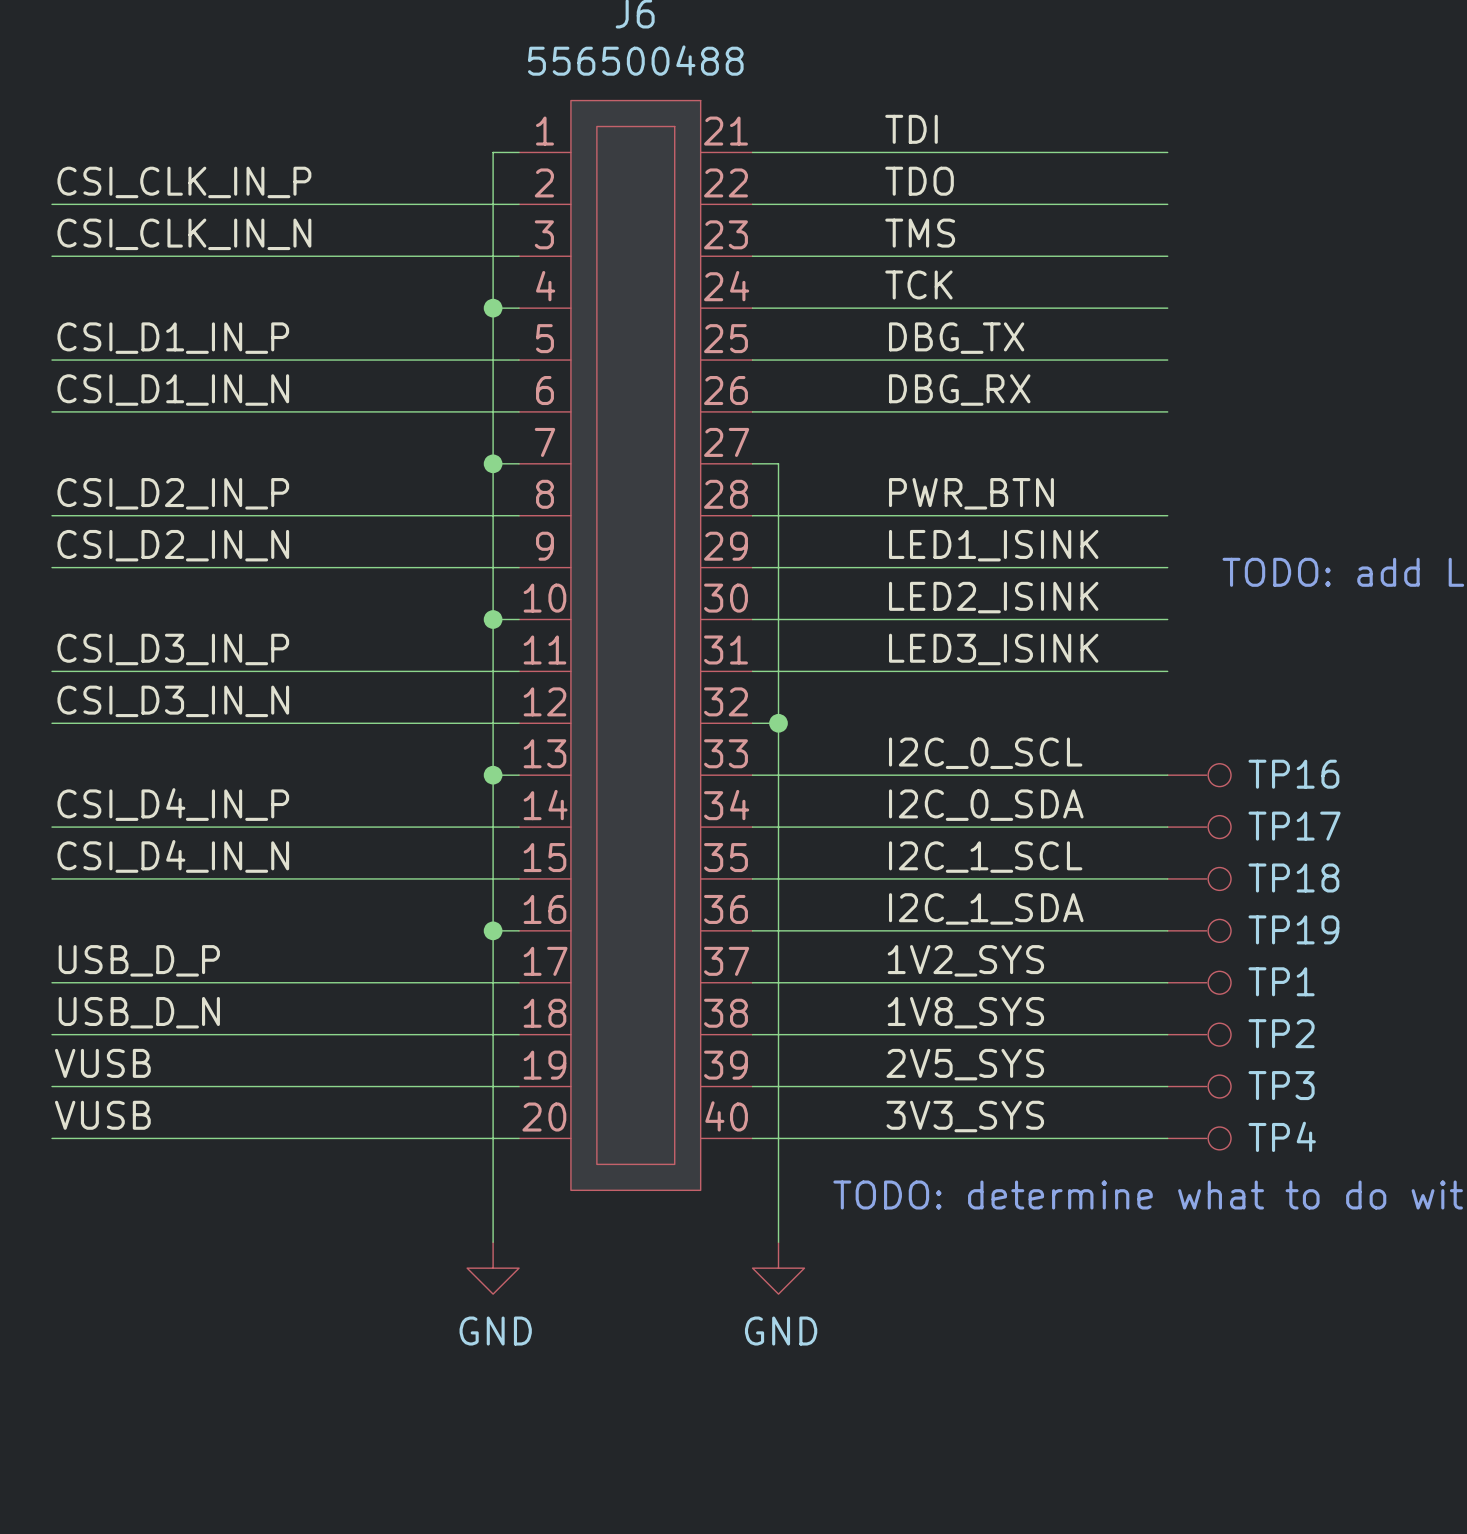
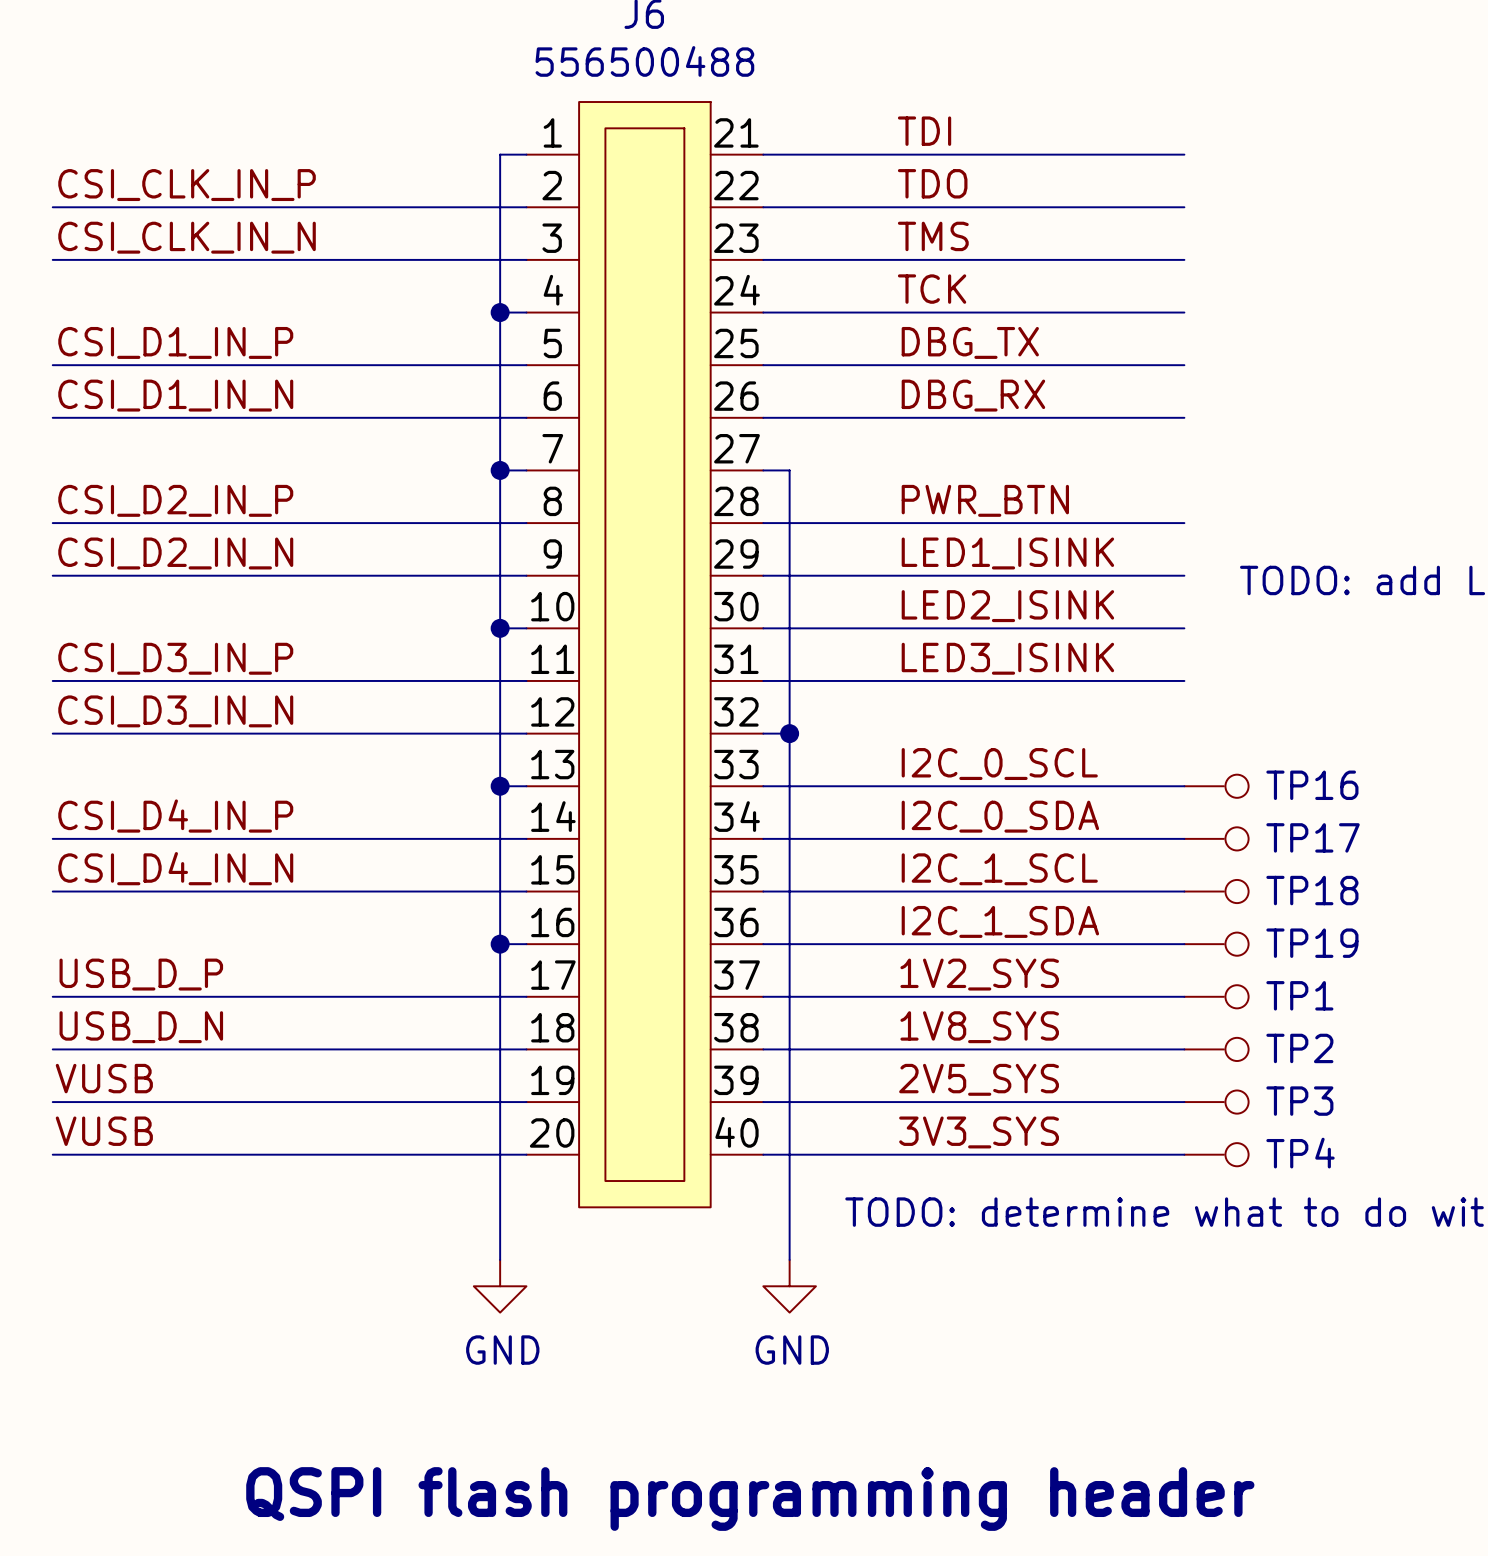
text: none -> QSPI flash programming header (750, 1499)

